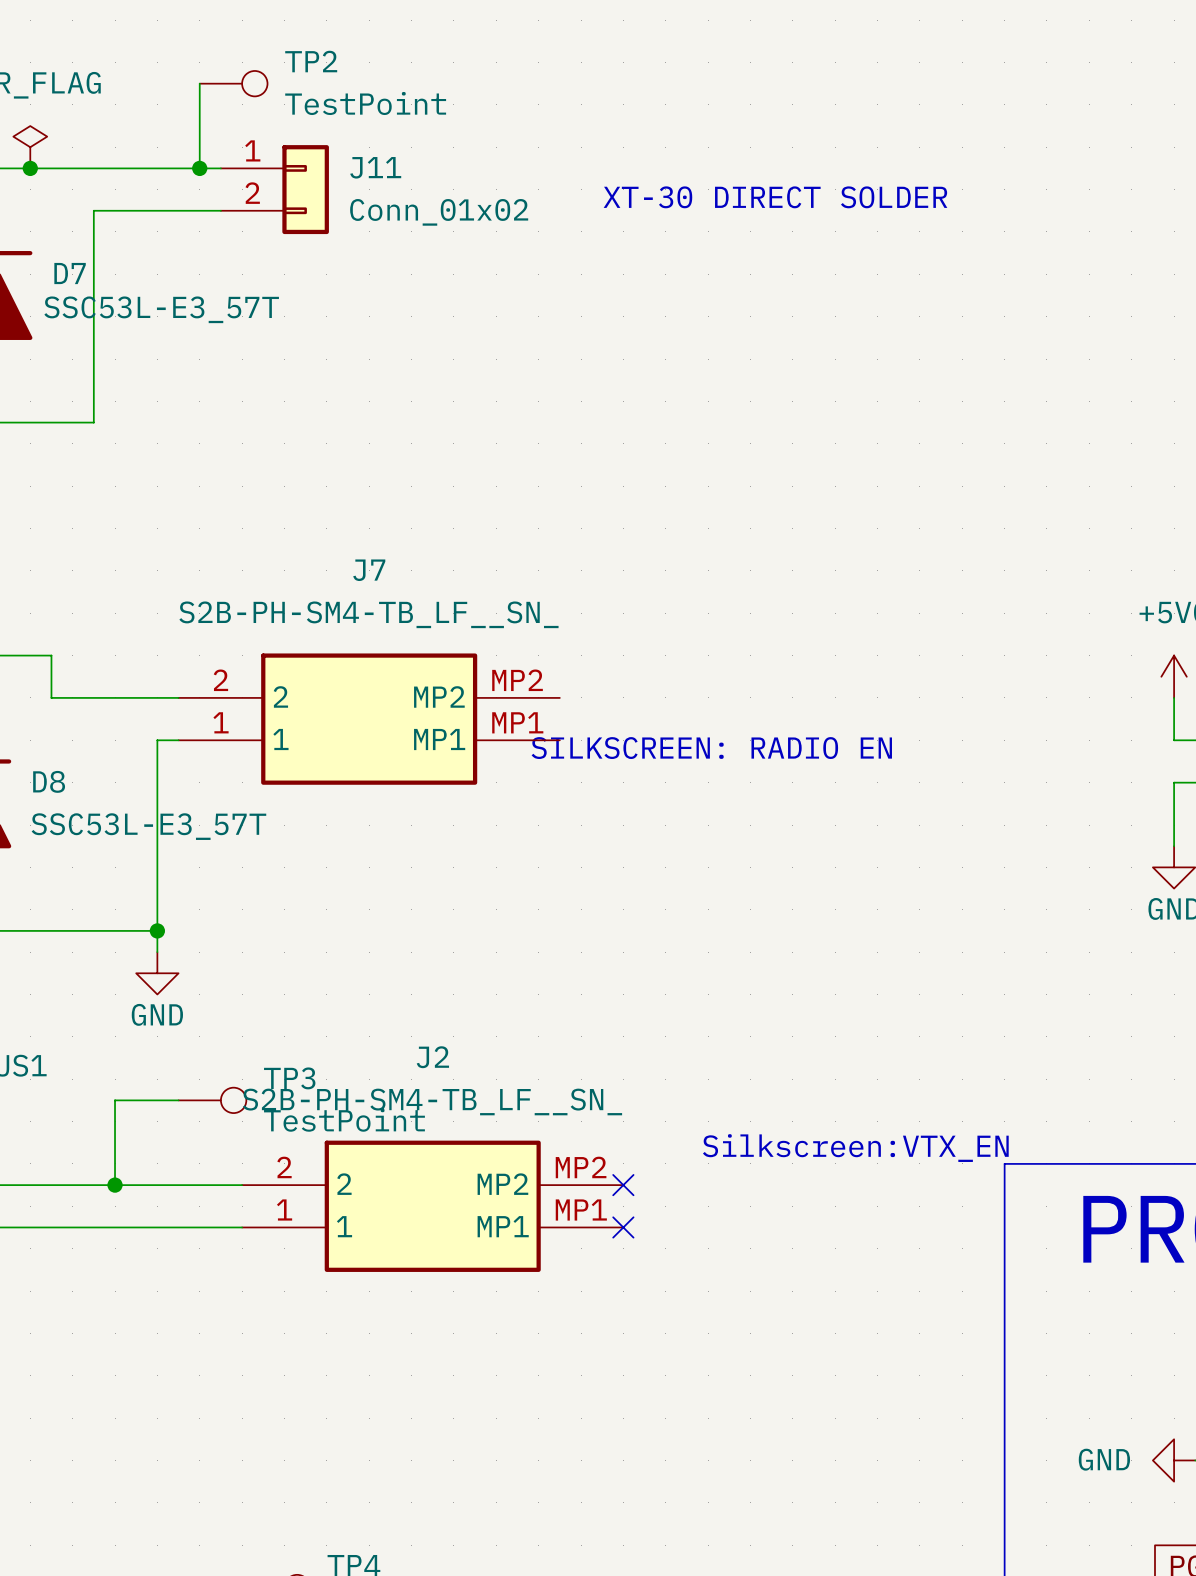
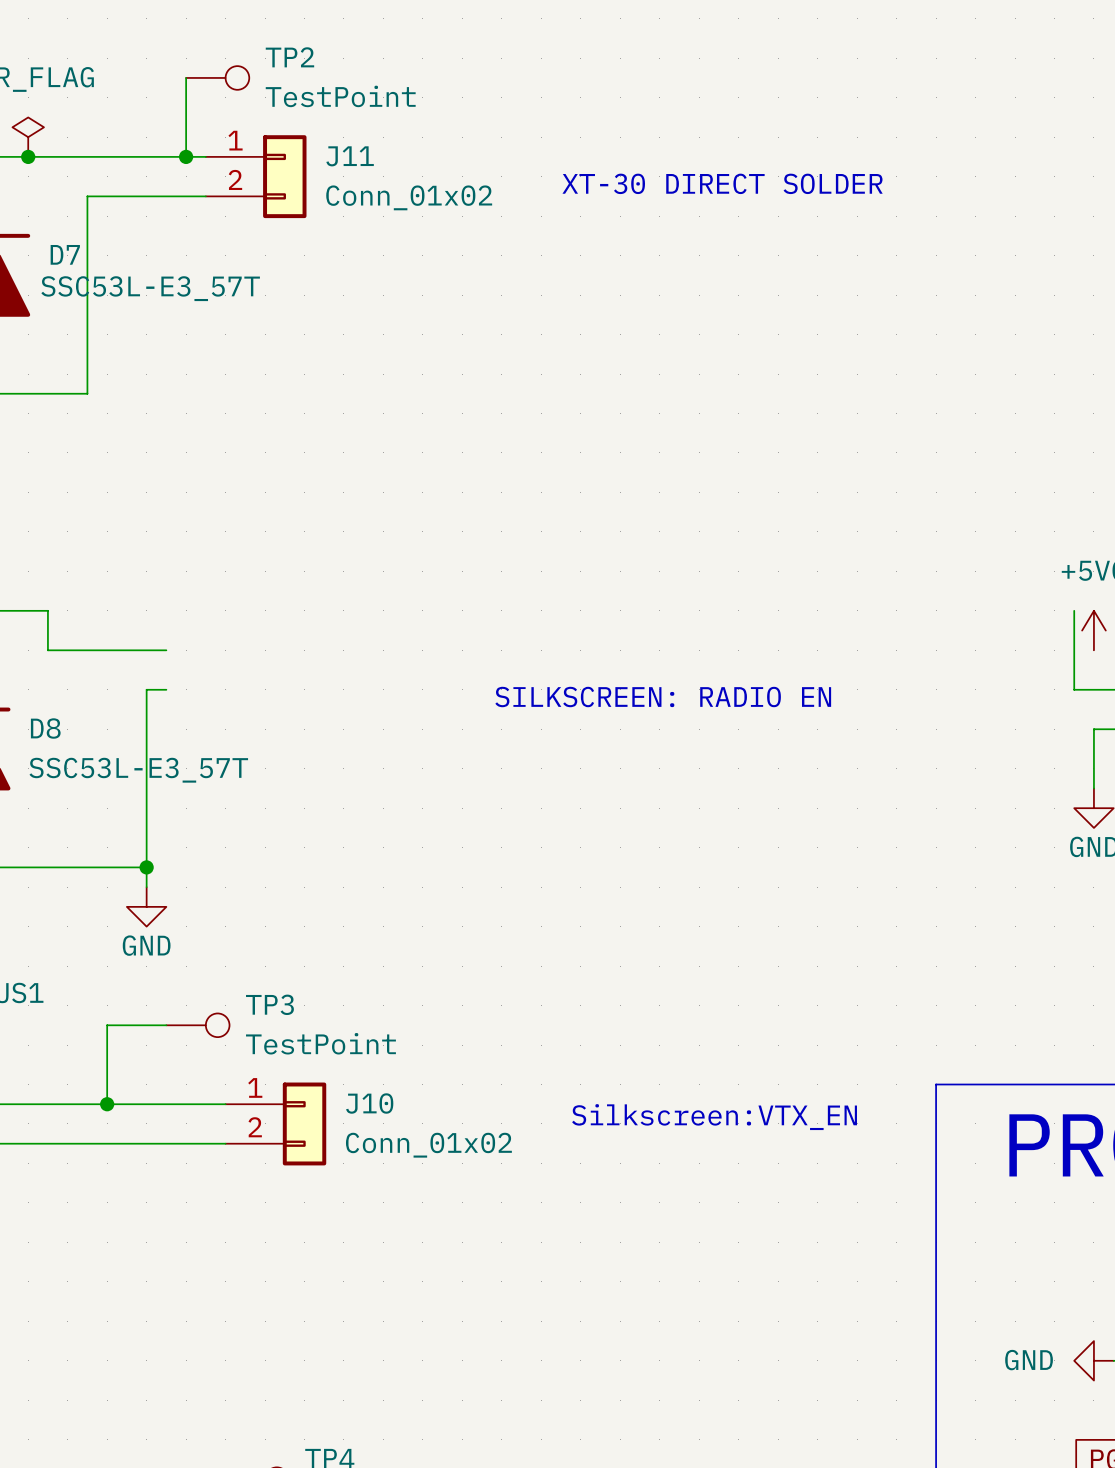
wire: (1174, 697) (1174, 740) -> (1074, 610) (1074, 689) (1093, 689)
J7: S2B-PH-SM4-TB_LF__SN_ (369, 719) -> none
text position: Silkscreen:VTX_EN (855, 1148) -> Silkscreen:VTX_EN (714, 1117)
no-connect mark: (623, 1185) -> none
J10: none -> Conn_01x02 (275, 1123)
J2: S2B-PH-SM4-TB_LF__SN_ (432, 1206) -> none
no-connect mark: (623, 1227) -> none

